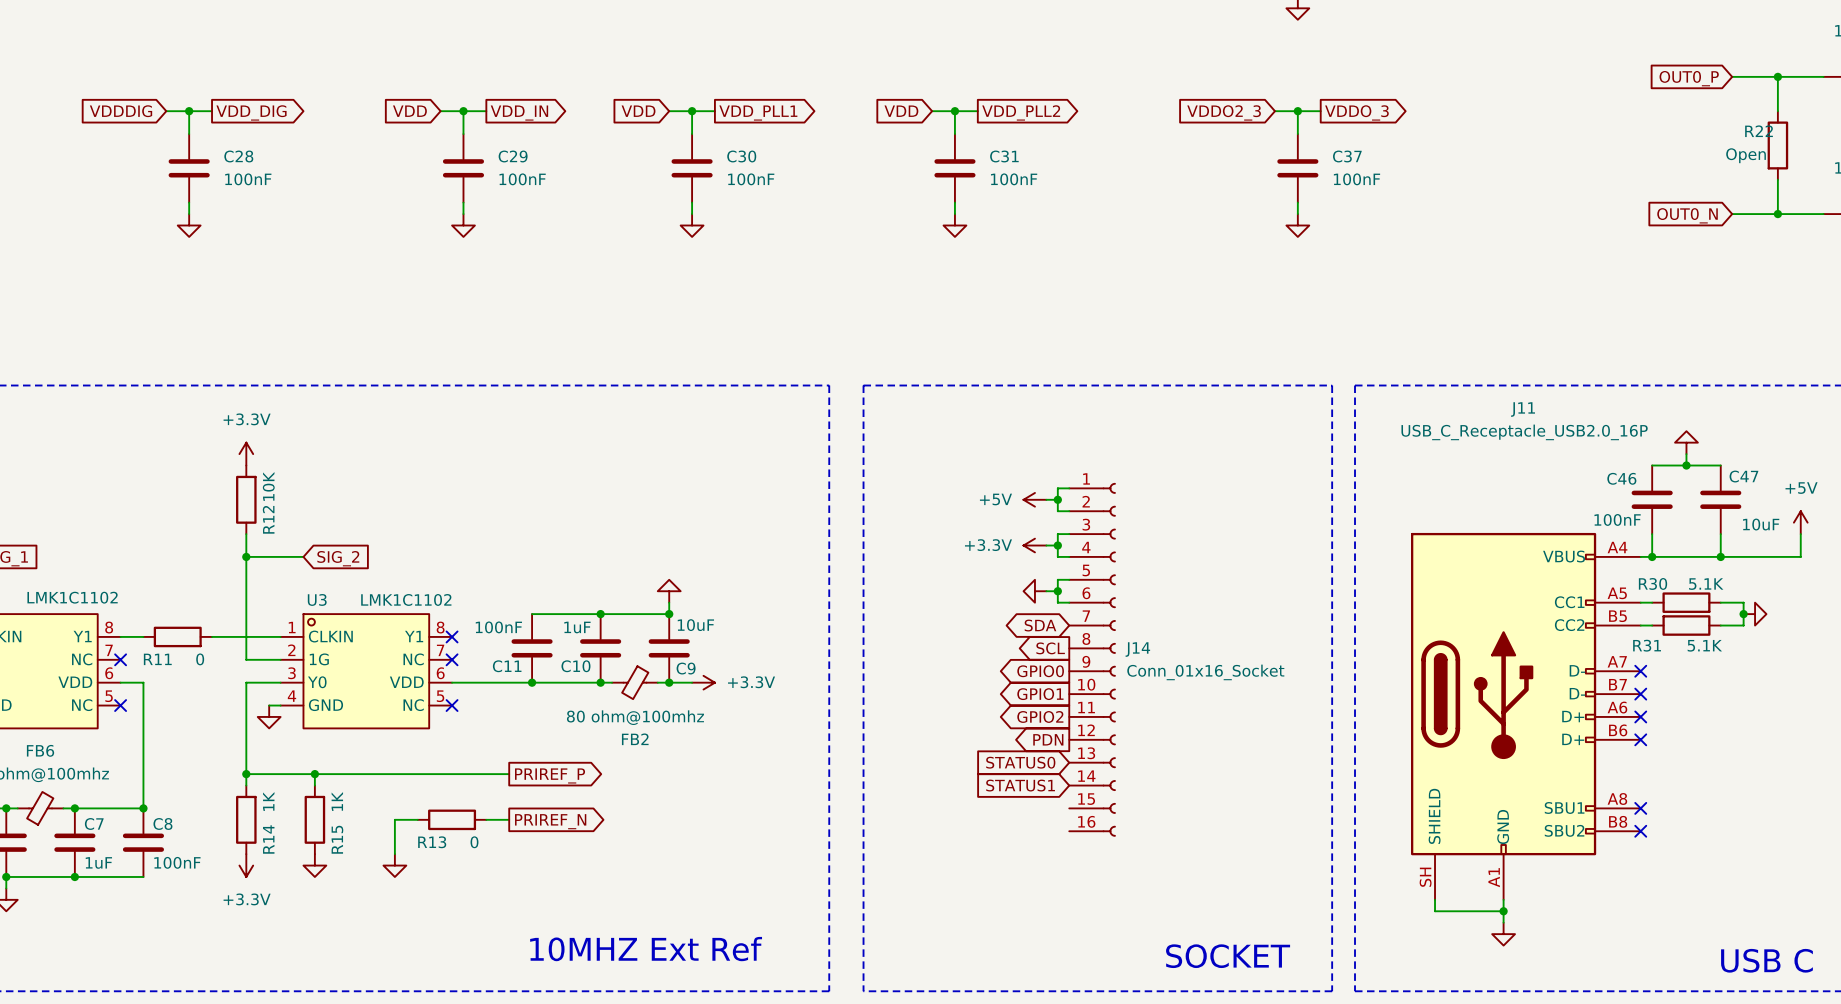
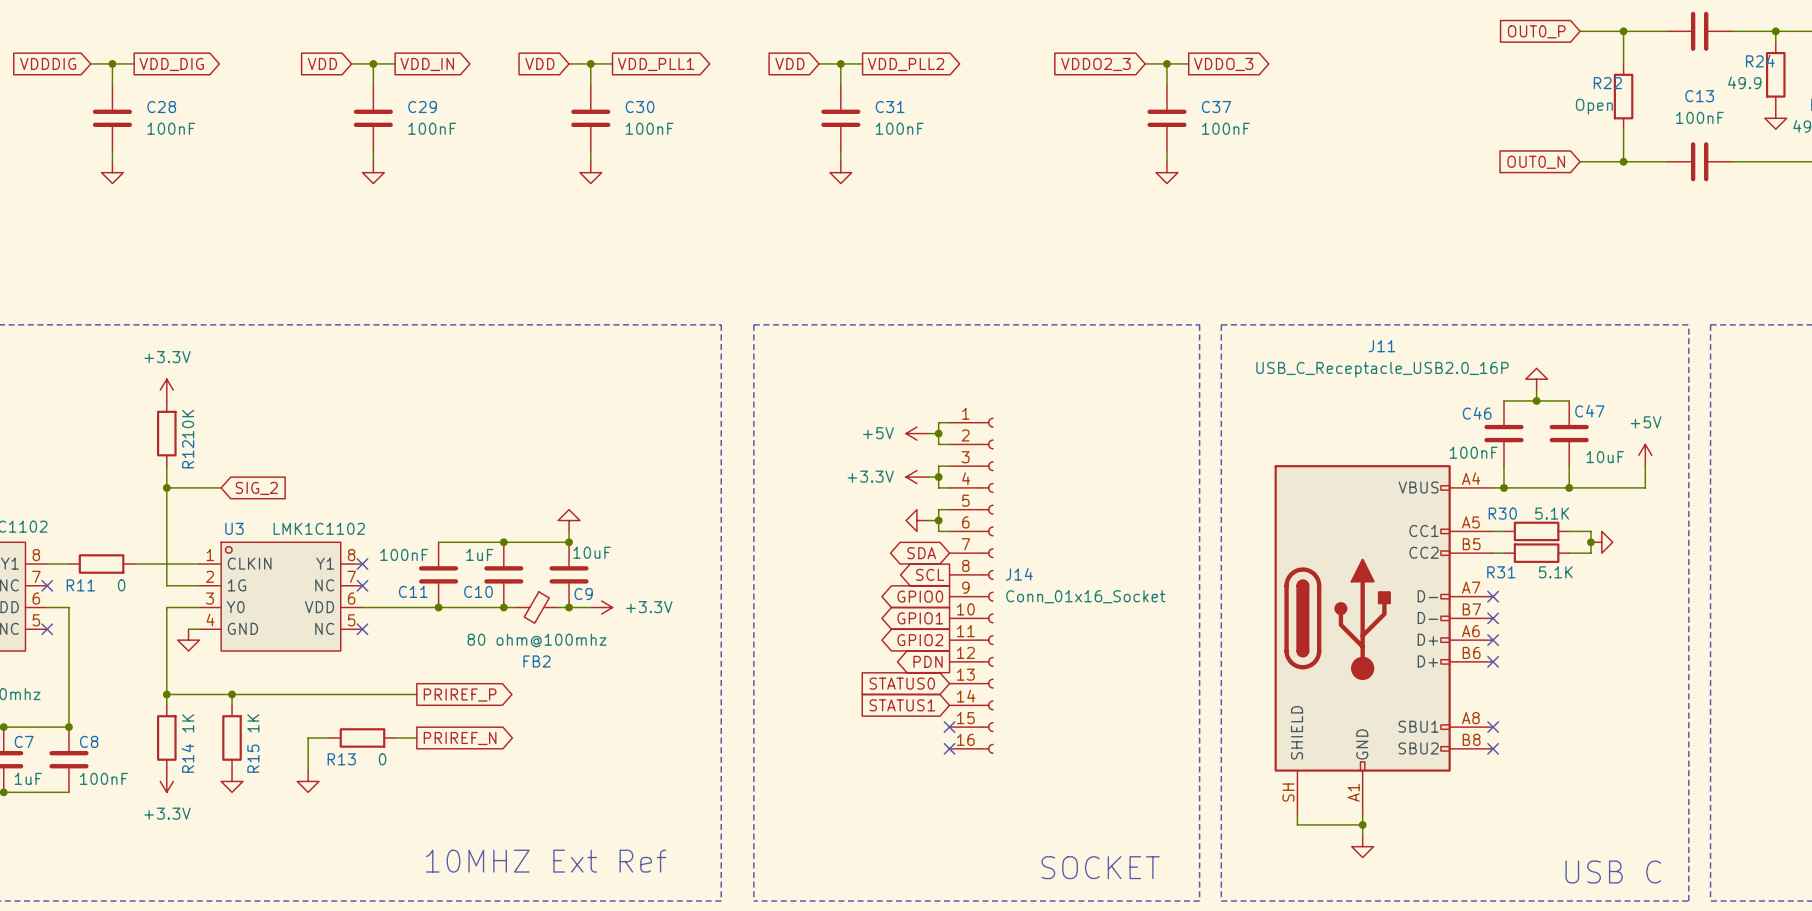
no-connect mark: none -> (949, 727)
no-connect mark: none -> (949, 748)

